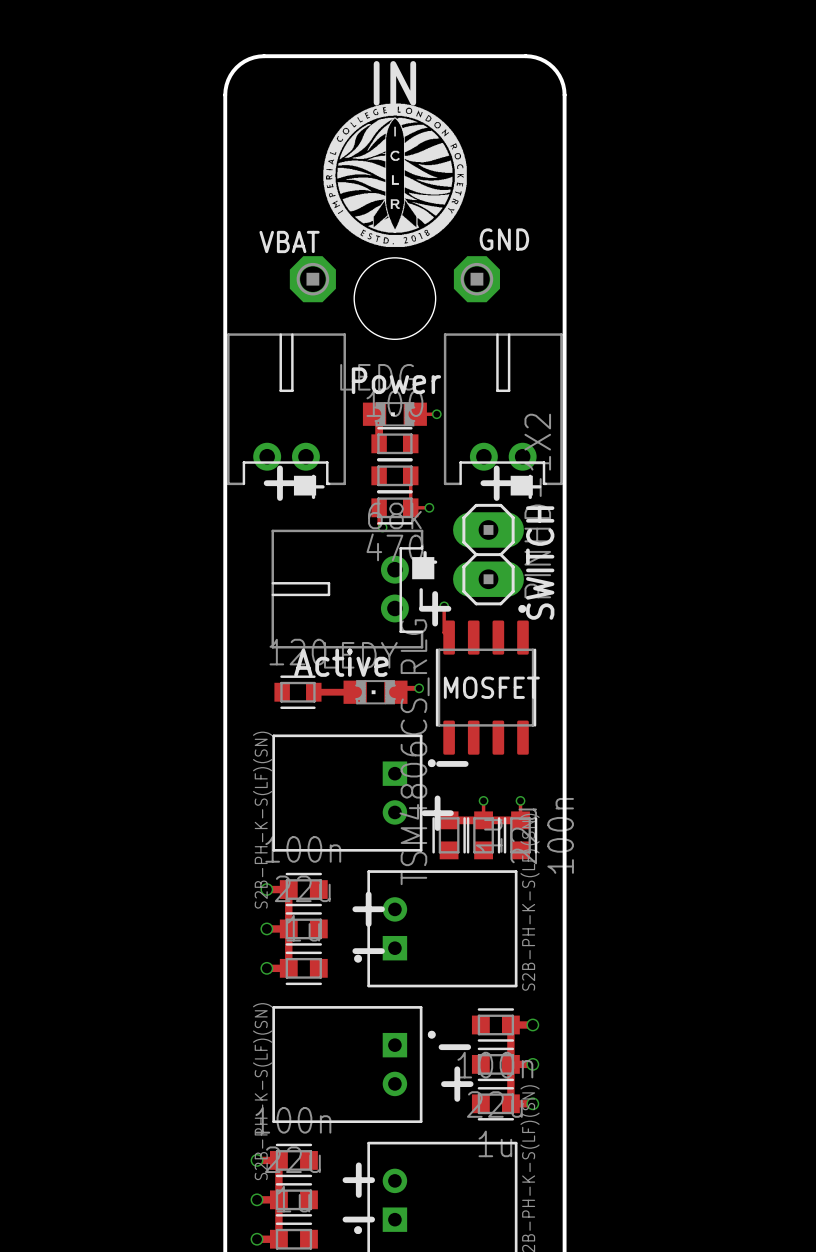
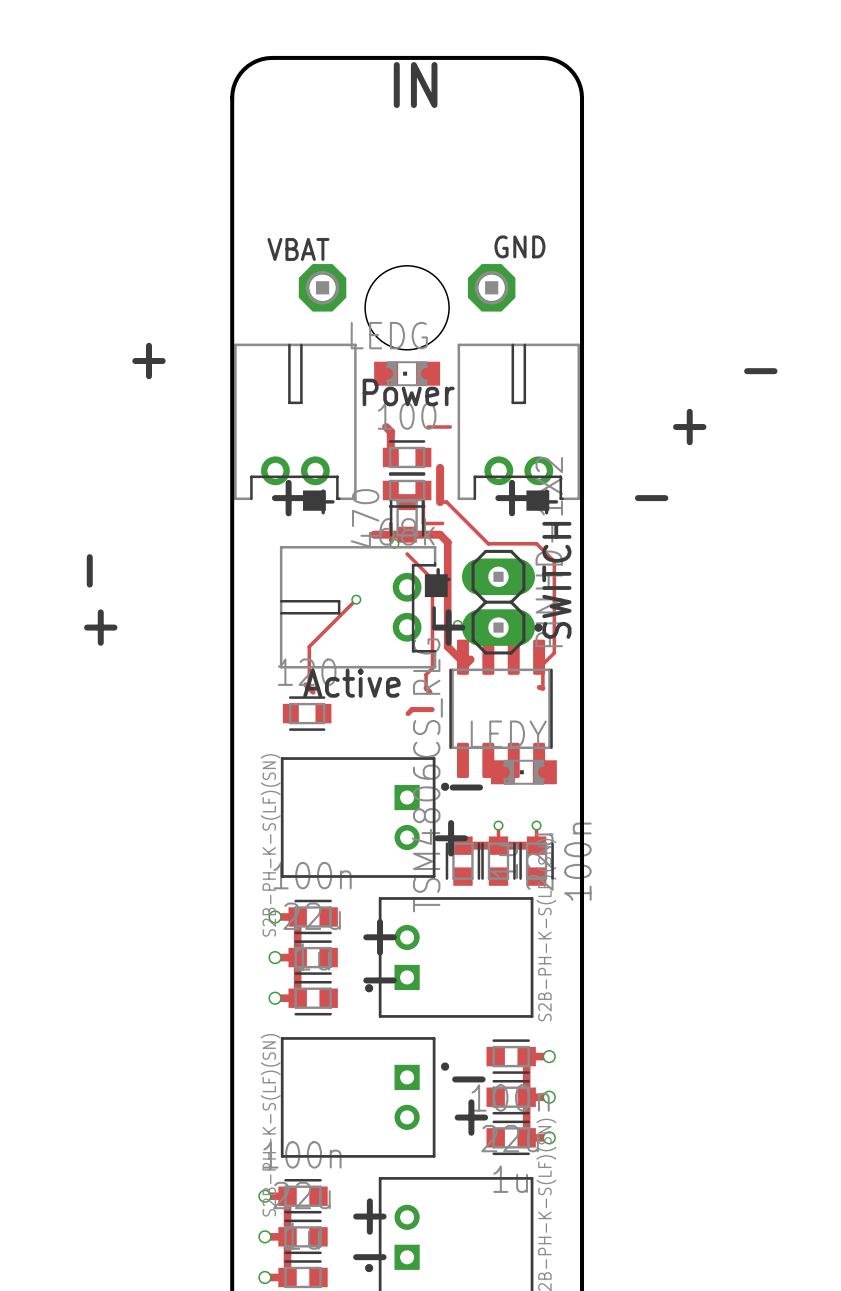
text position: IN (394, 83) -> IN (415, 85)
drawing: [323, 103, 467, 247] -> none
text: none -> + (148, 361)
text: none -> - (760, 371)
part position: (394, 414) -> (407, 373)
via: (436, 414) -> none
text: none -> + (689, 427)
track: none -> (440, 467) (440, 502) (446, 502) (488, 543) (536, 543) (554, 561) (554, 652) (542, 664) (542, 688) (539, 687)
text: none -> - (651, 498)
part rotation: 0° (394, 507) -> 90° clockwise (407, 518)
via: (429, 507) -> none
track: none -> (374, 534) (440, 534) (447, 542) (447, 646) (465, 664) (470, 659)
track: none -> (407, 553) (432, 579) (432, 668) (426, 674) (426, 688) (429, 692)
text: none -> - (89, 570)
part position: (488, 554) -> (498, 602)
track: none -> (356, 599) (309, 646) (309, 688)
via: none -> (356, 599)
track: (444, 606) (444, 632) (449, 637) -> none
text: none -> + (100, 627)
track: none -> (305, 684) (313, 692)
text: MOSFET (491, 687) -> none
via: (419, 688) -> none
track: (313, 692) (355, 692) -> none
part position: (375, 692) -> (523, 772)

